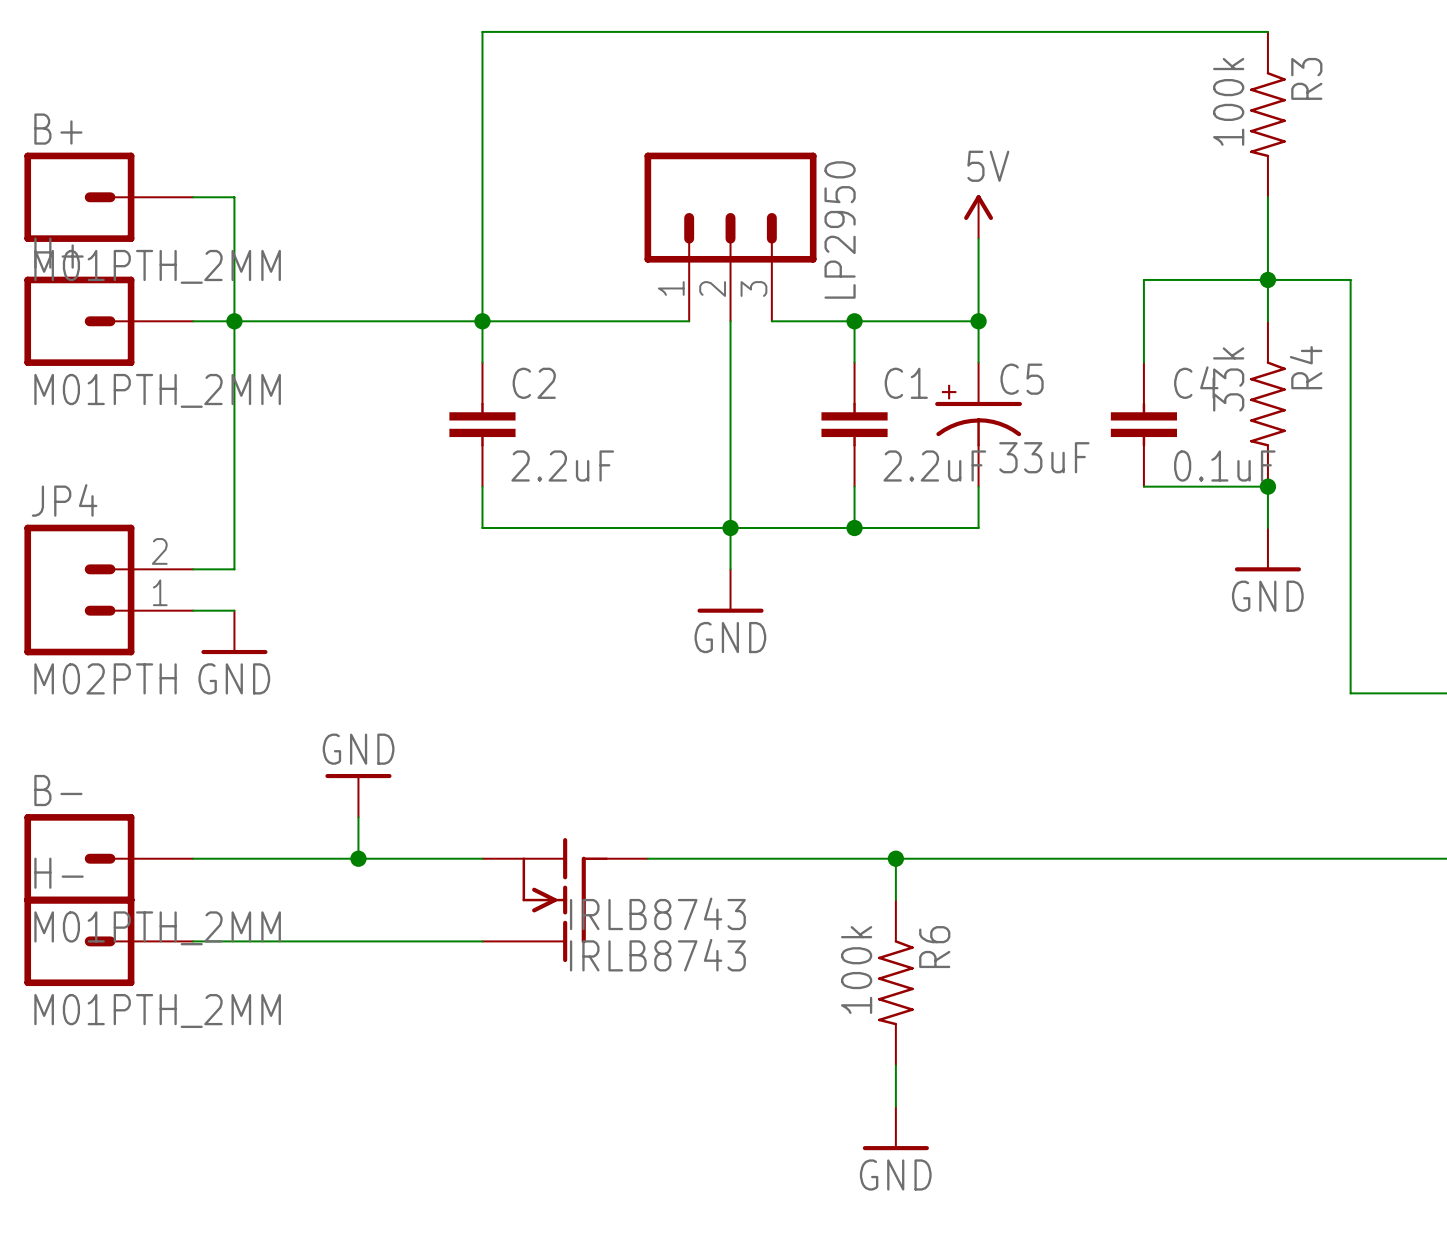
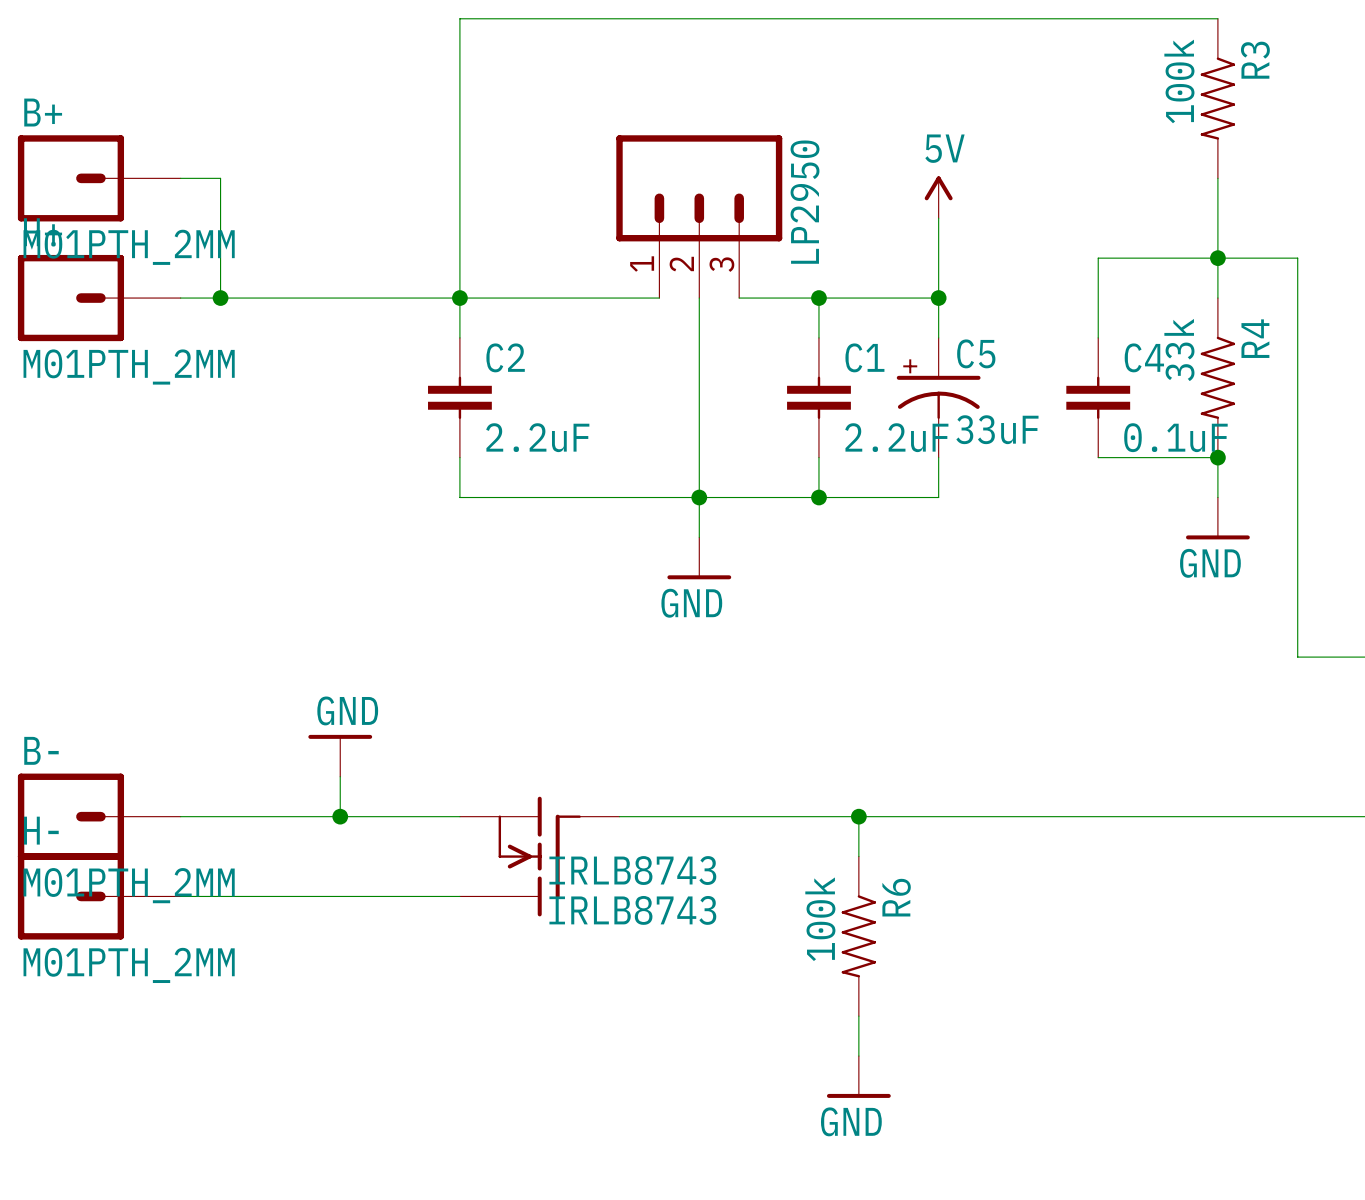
wire: (234, 321) (234, 569) (193, 569) -> none
JP4: M02PTH (108, 590) -> none
wire: (193, 610) (234, 610) -> none
power symbol: GND (234, 632) -> none

